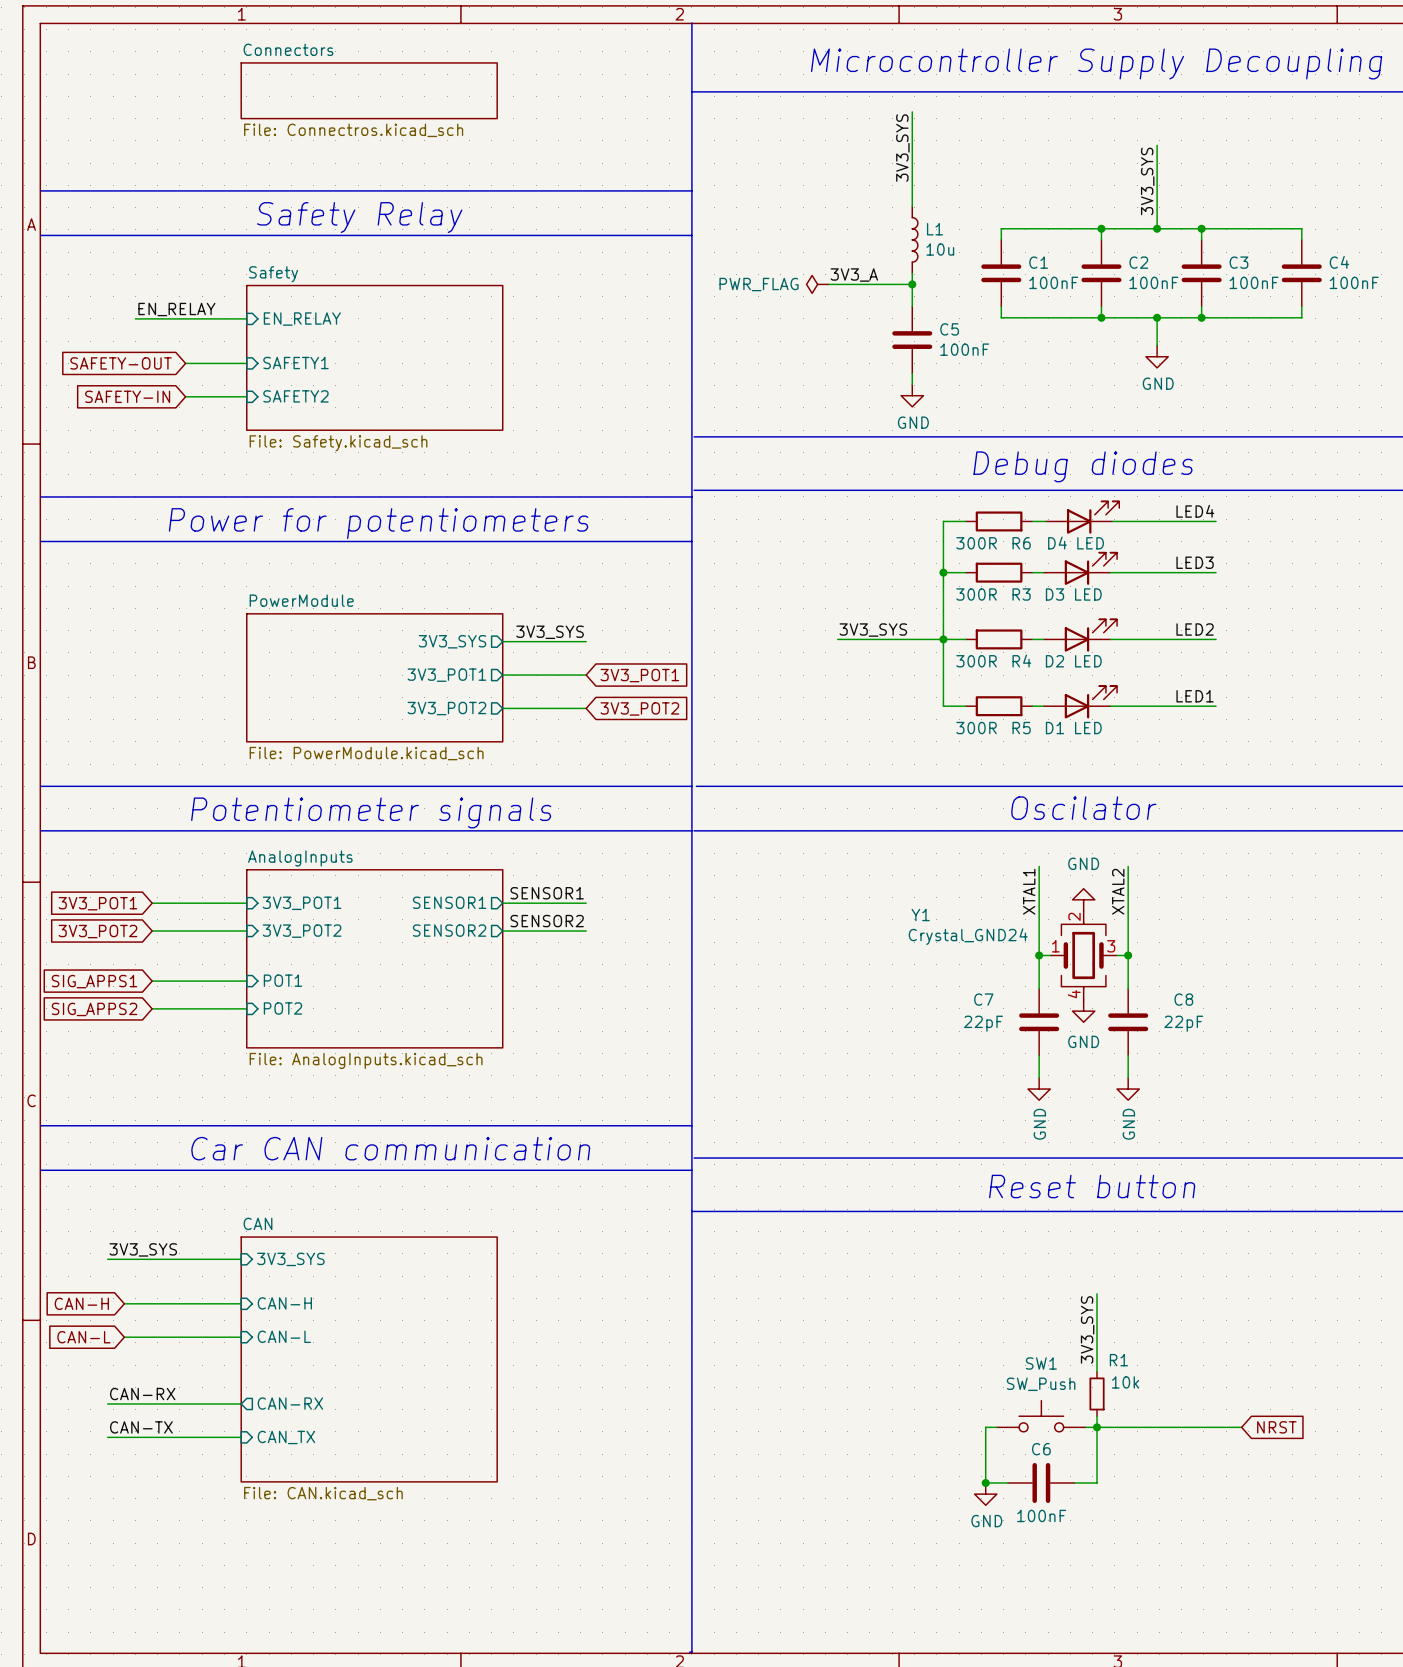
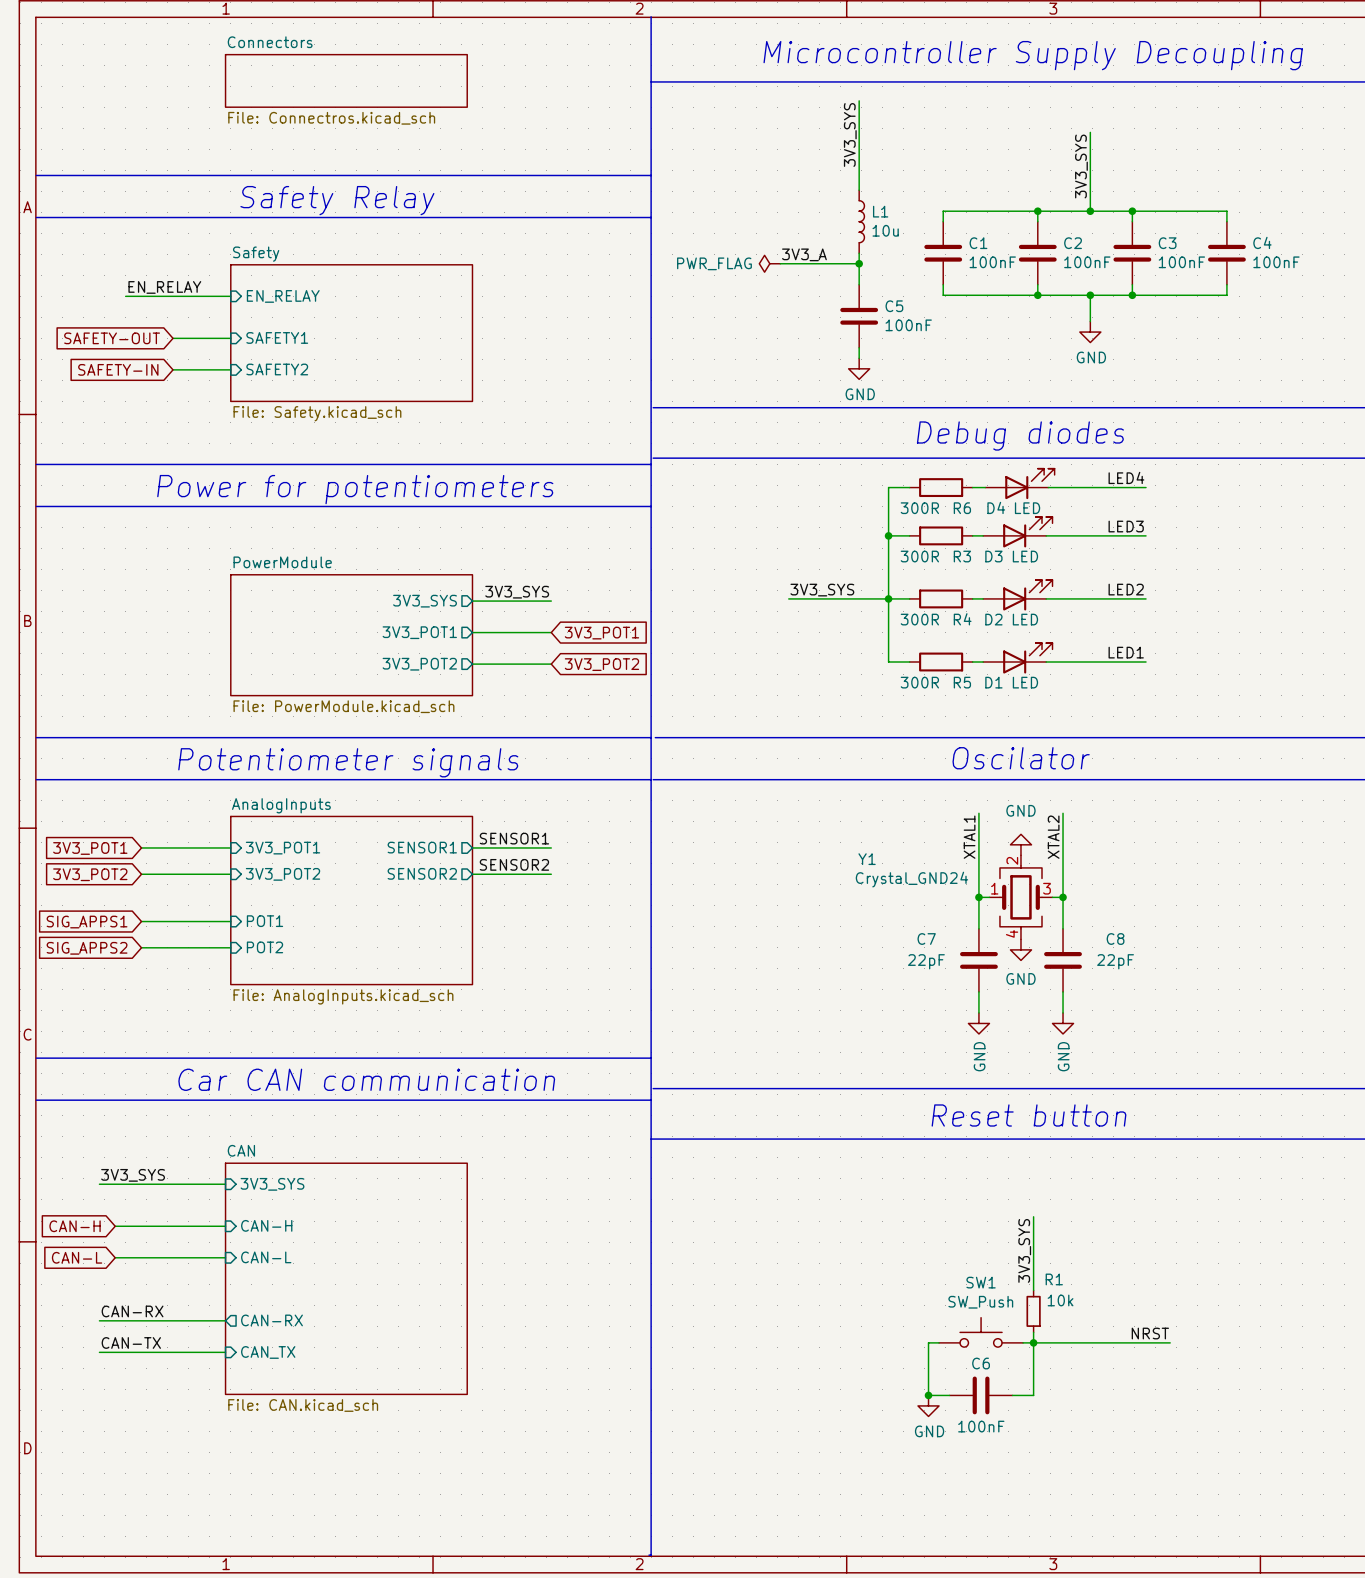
label: none -> NRST (1150, 1333)
global label: NRST (1276, 1427) -> none

